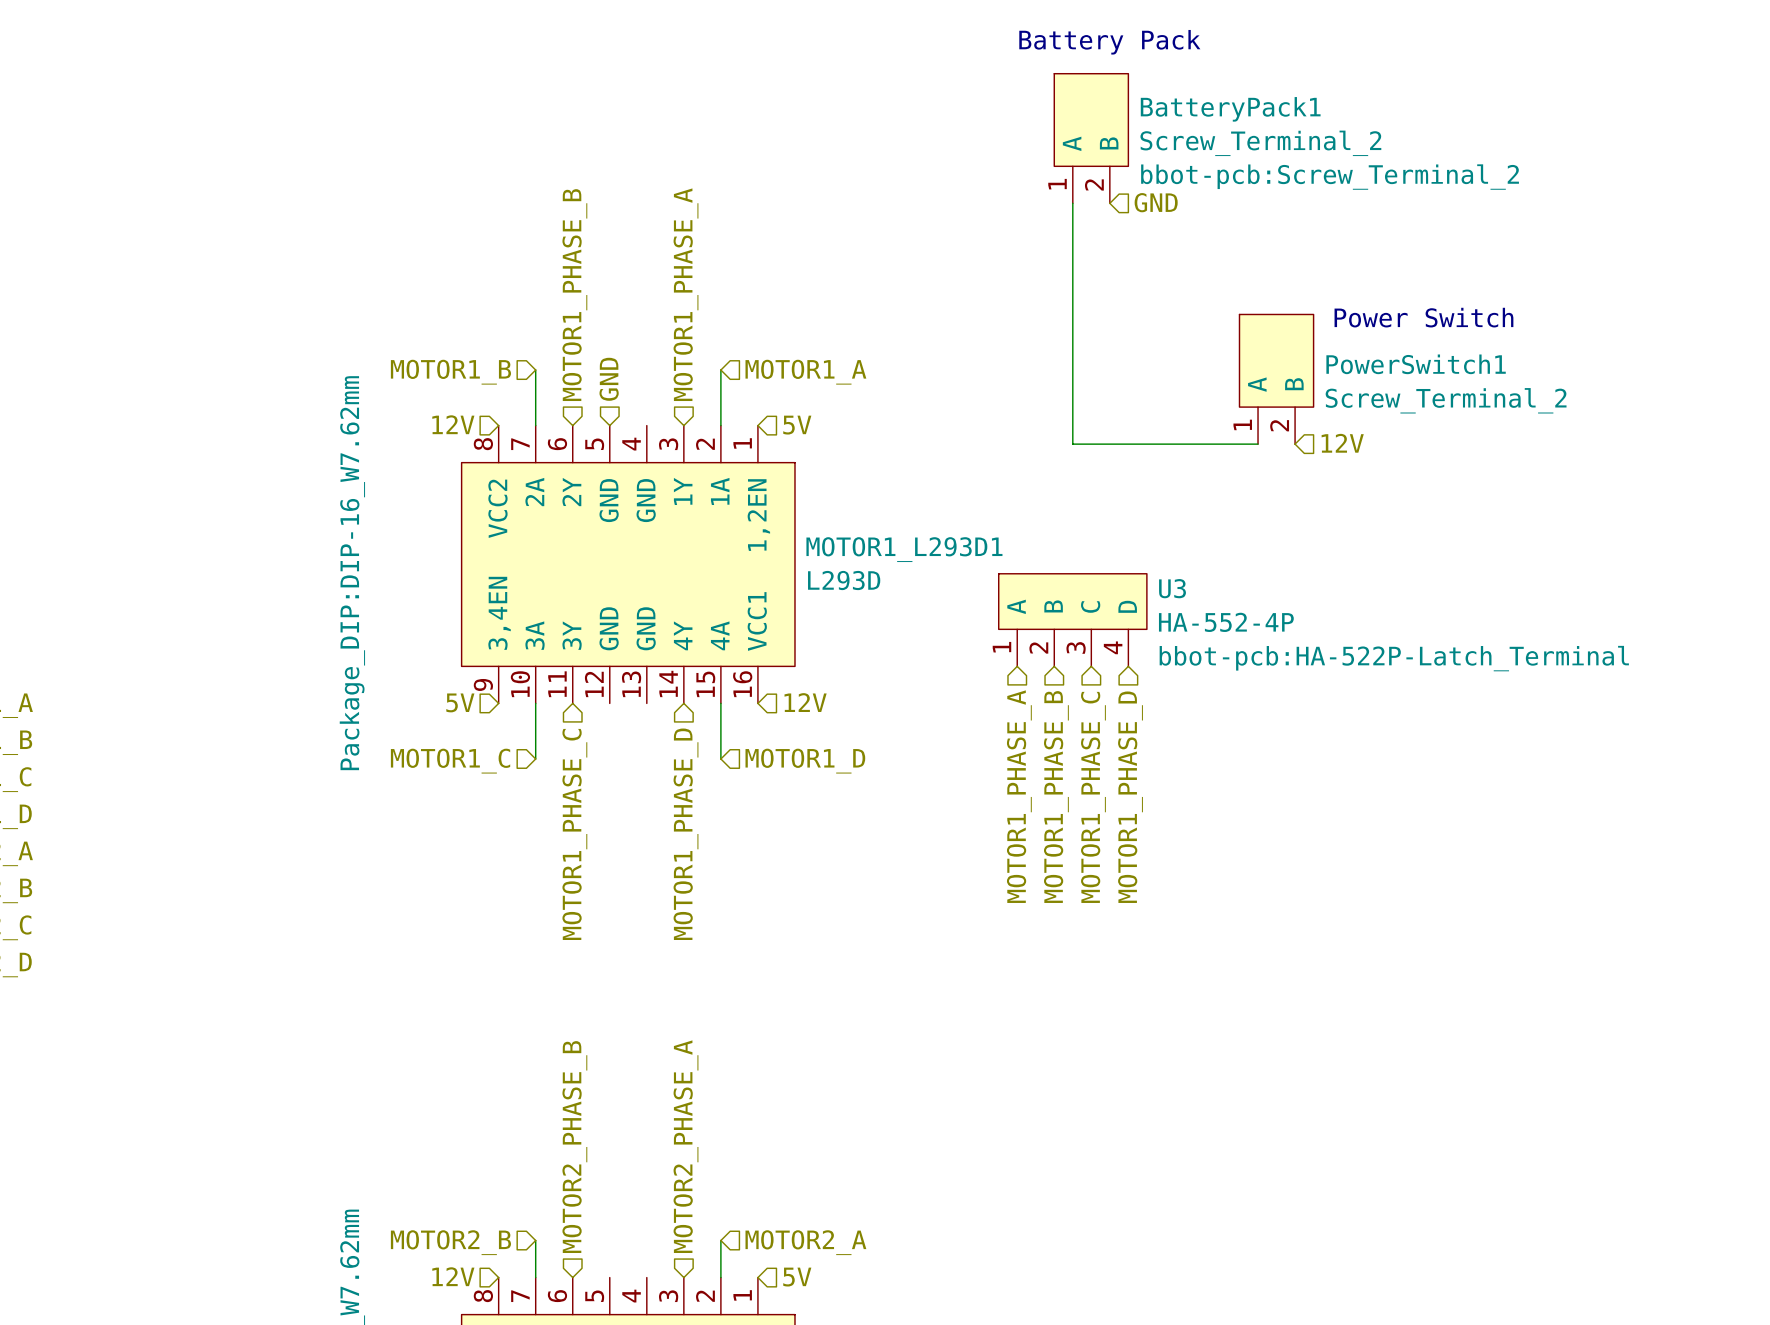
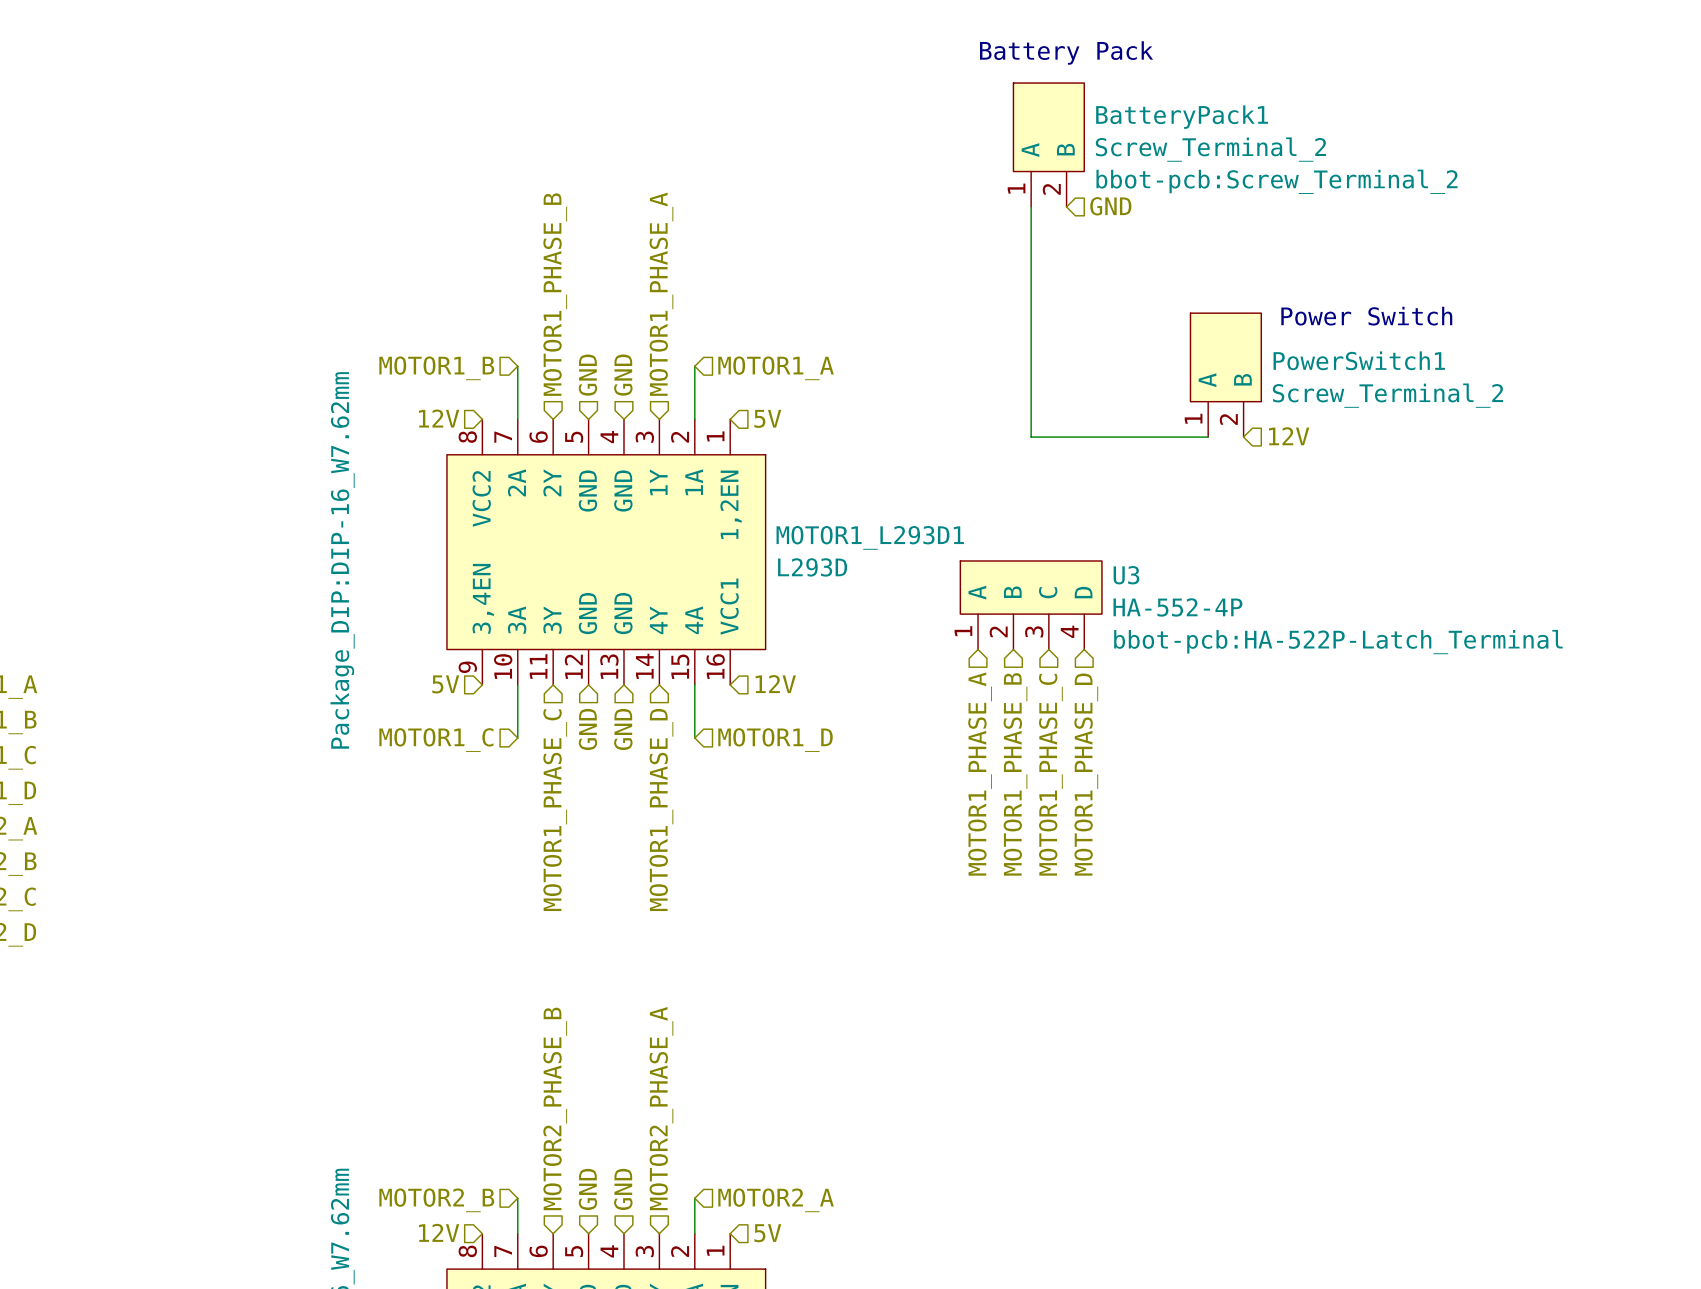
hierarchical label: none -> GND (623, 375)
hierarchical label: none -> GND (587, 729)
hierarchical label: none -> GND (623, 729)
hierarchical label: none -> GND (587, 1189)
hierarchical label: none -> GND (623, 1189)

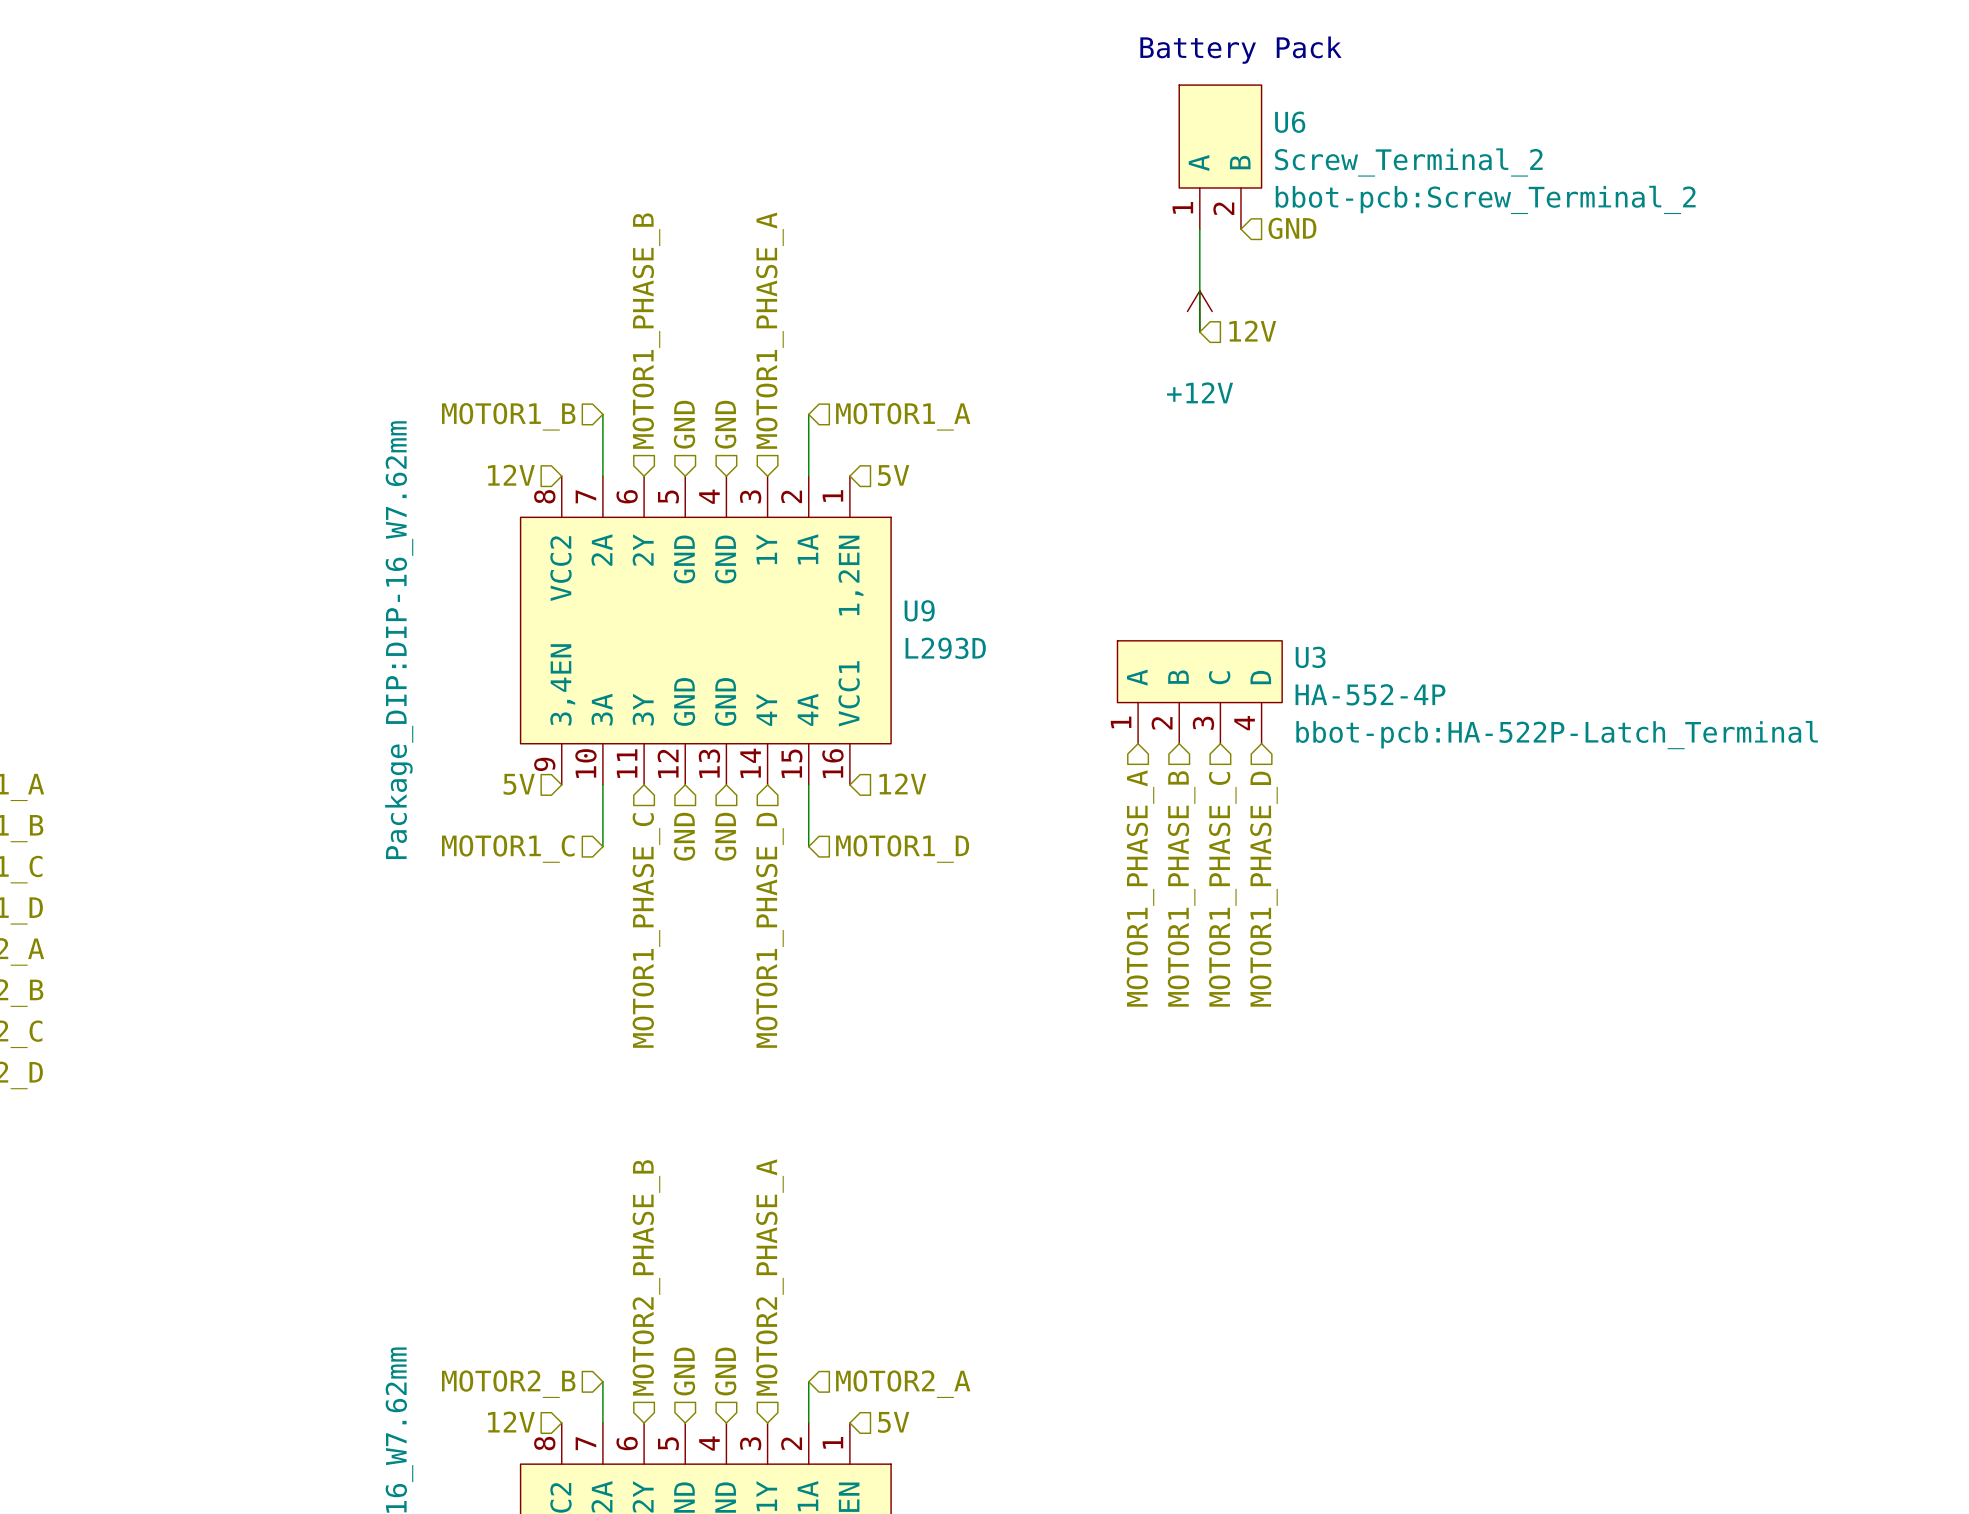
BatteryPack1 name: BatteryPack1 (1182, 117) -> U6 (1290, 122)
power symbol: none -> +12V (1199, 311)
wire: (1031, 295) (1031, 437) (1208, 437) -> none
text: Power Switch (1366, 316) -> none
PowerSwitch1: Screw_Terminal_2 (1225, 375) -> none
hierarchical label position: 12V (1289, 436) -> 12V (1252, 331)
MOTOR1_L293D1 name: MOTOR1_L293D1 (870, 537) -> U9 (919, 610)

